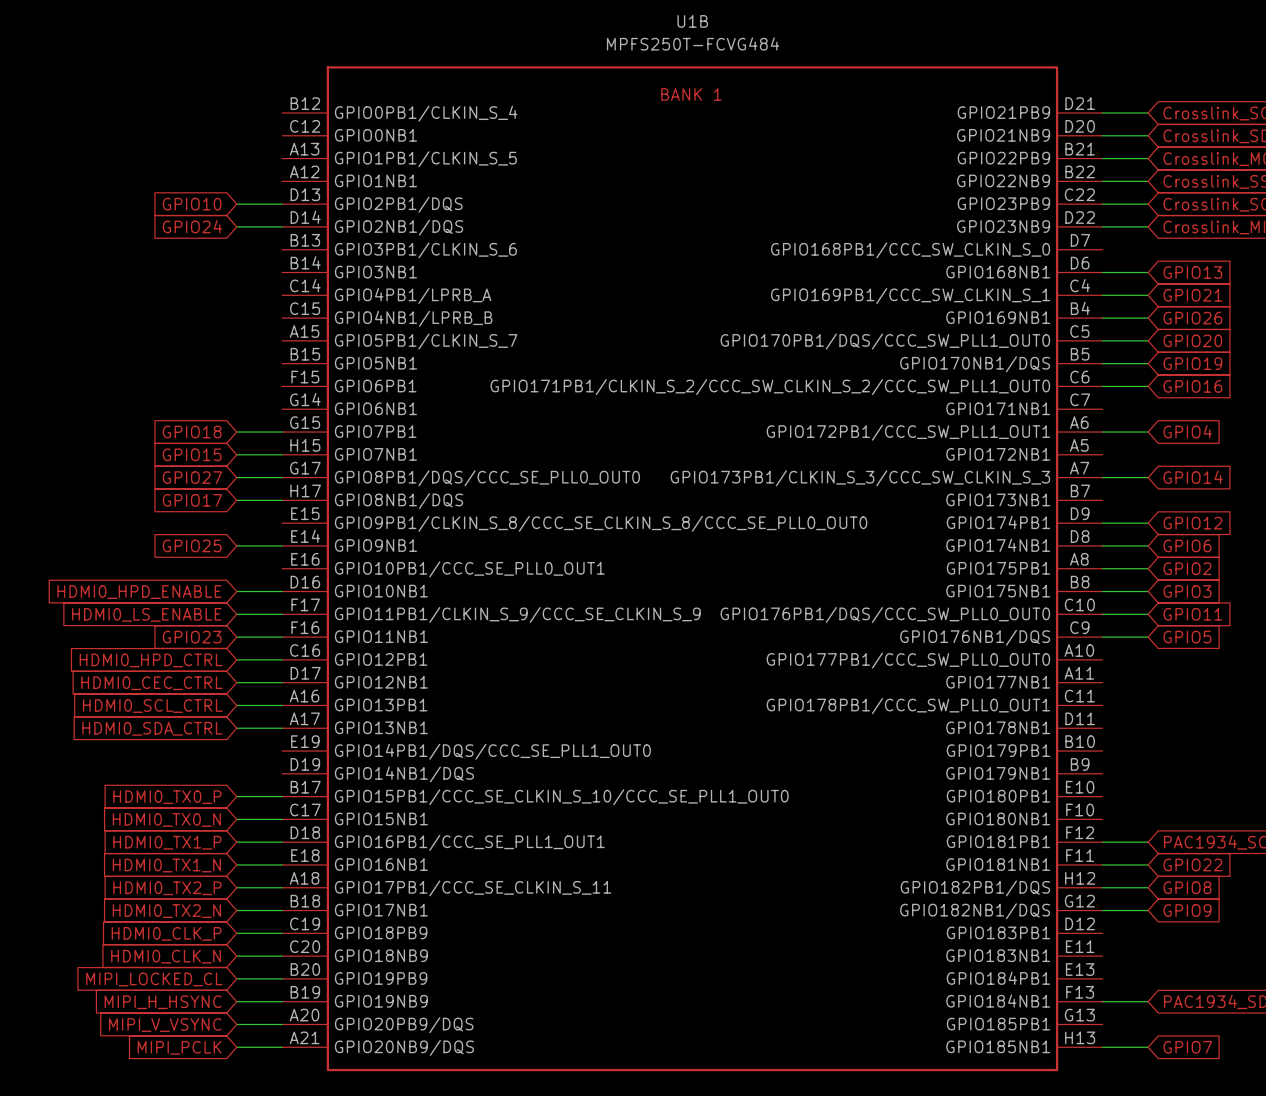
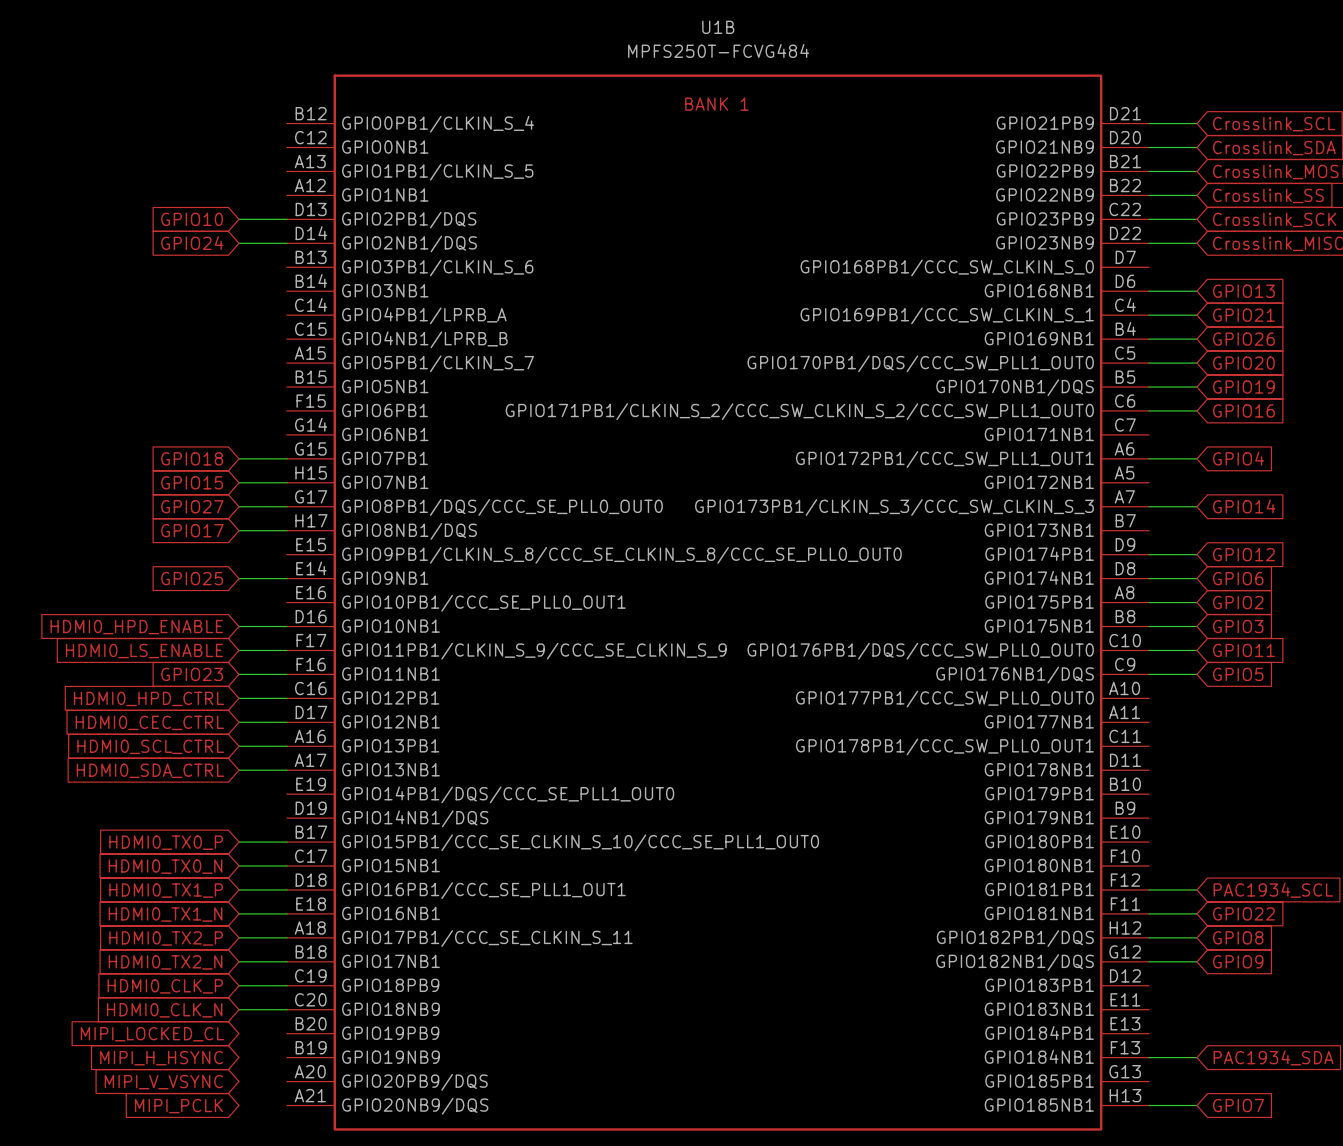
wire: (236, 978) (282, 978) -> none
wire: (236, 1001) (282, 1001) -> none
wire: (236, 1024) (282, 1024) -> none
wire: (236, 1047) (282, 1047) -> none

